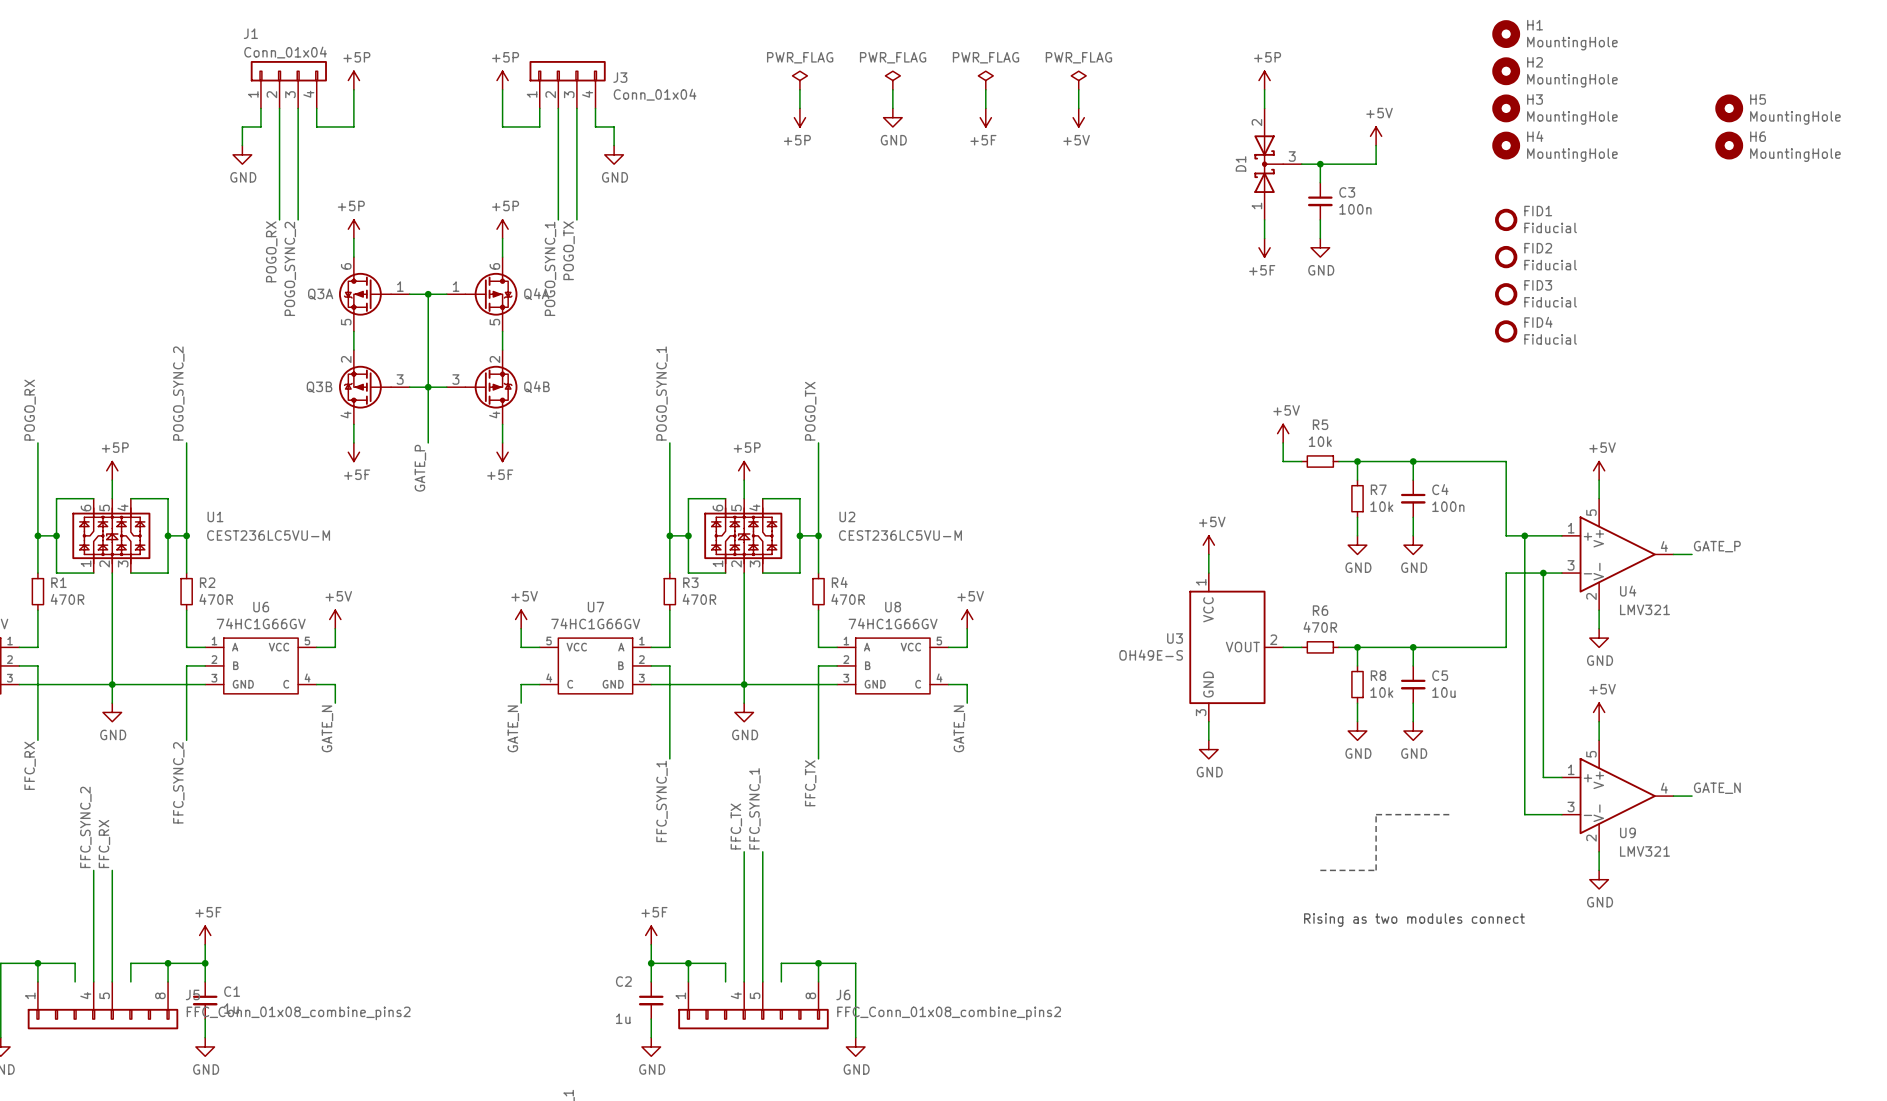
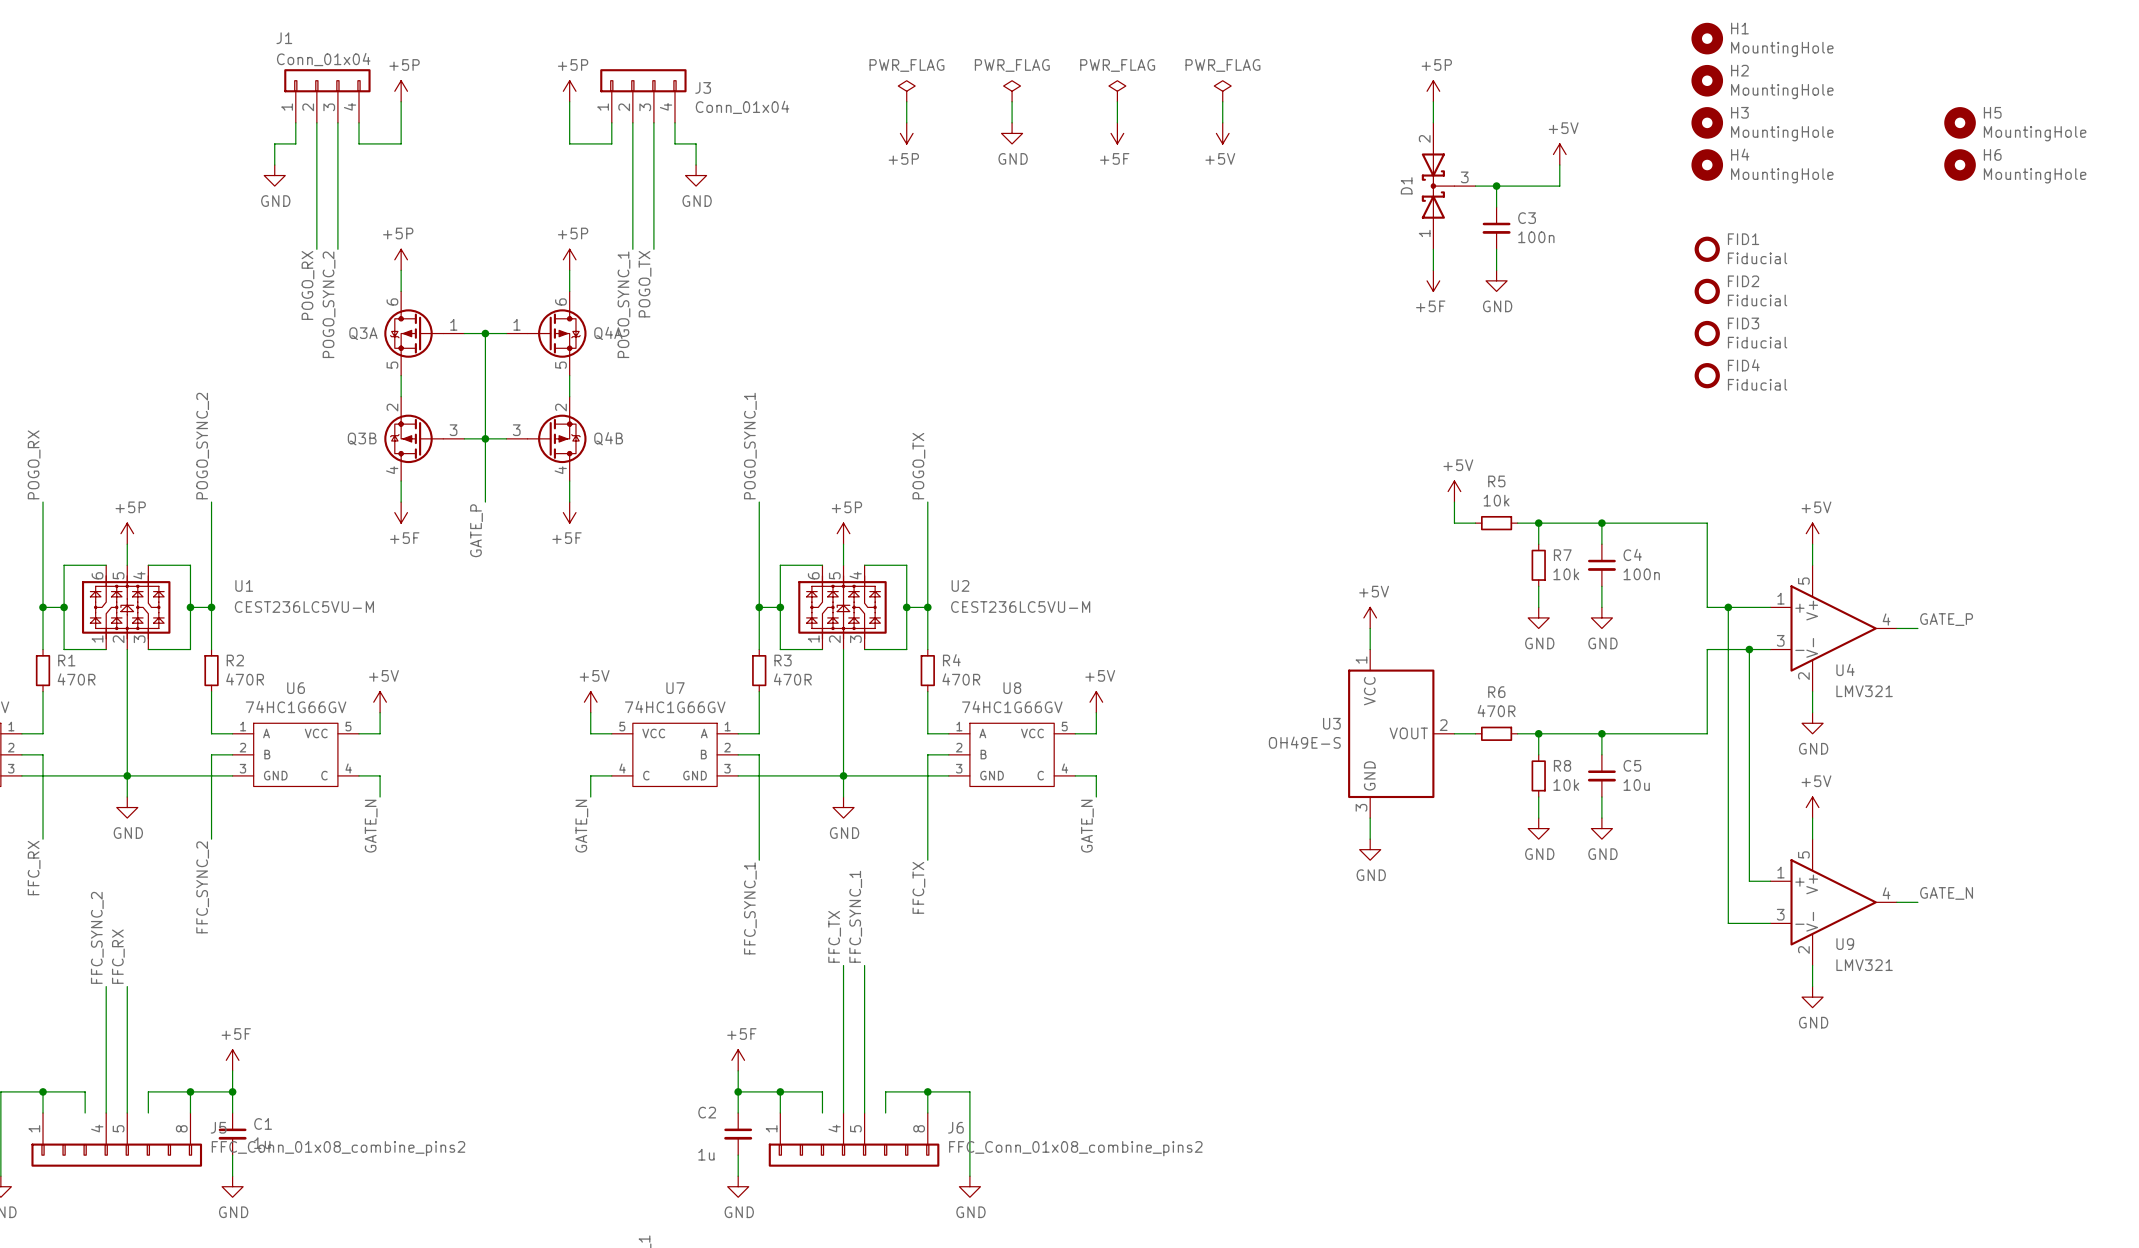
line: (1450, 814) (1376, 814) (1376, 870) (1320, 870) -> none
text: Rising as two modules connect (1414, 920) -> none

